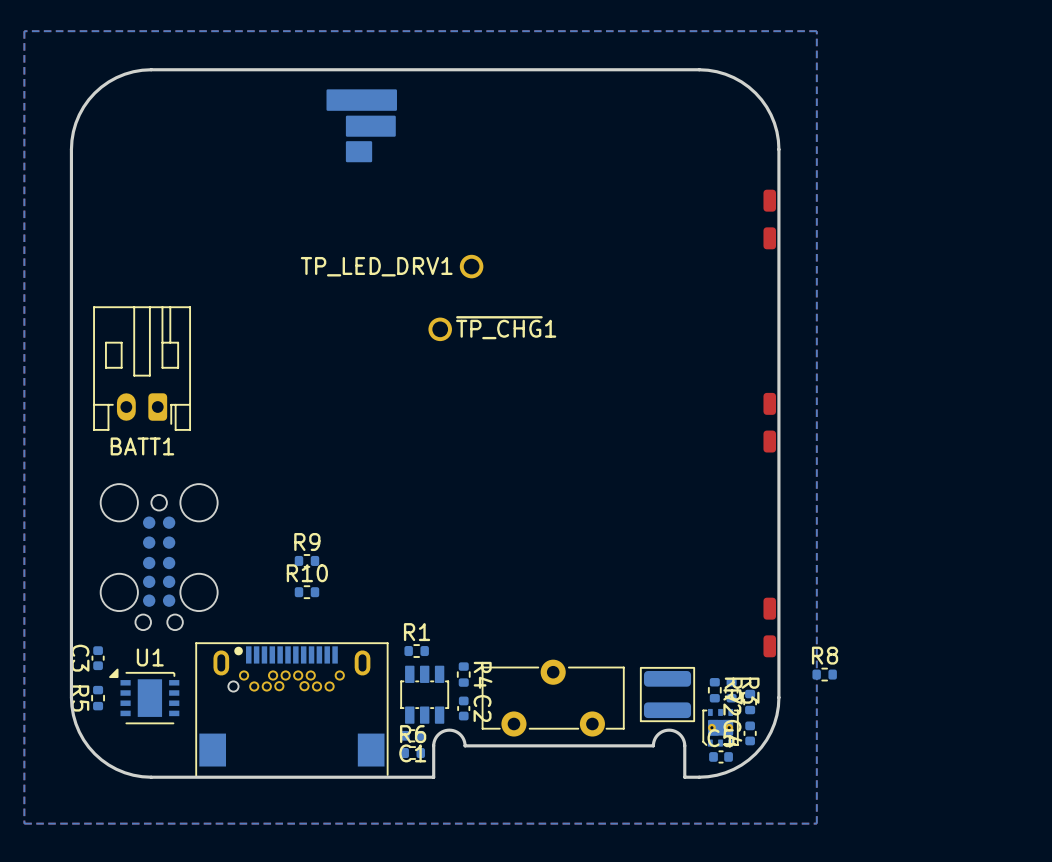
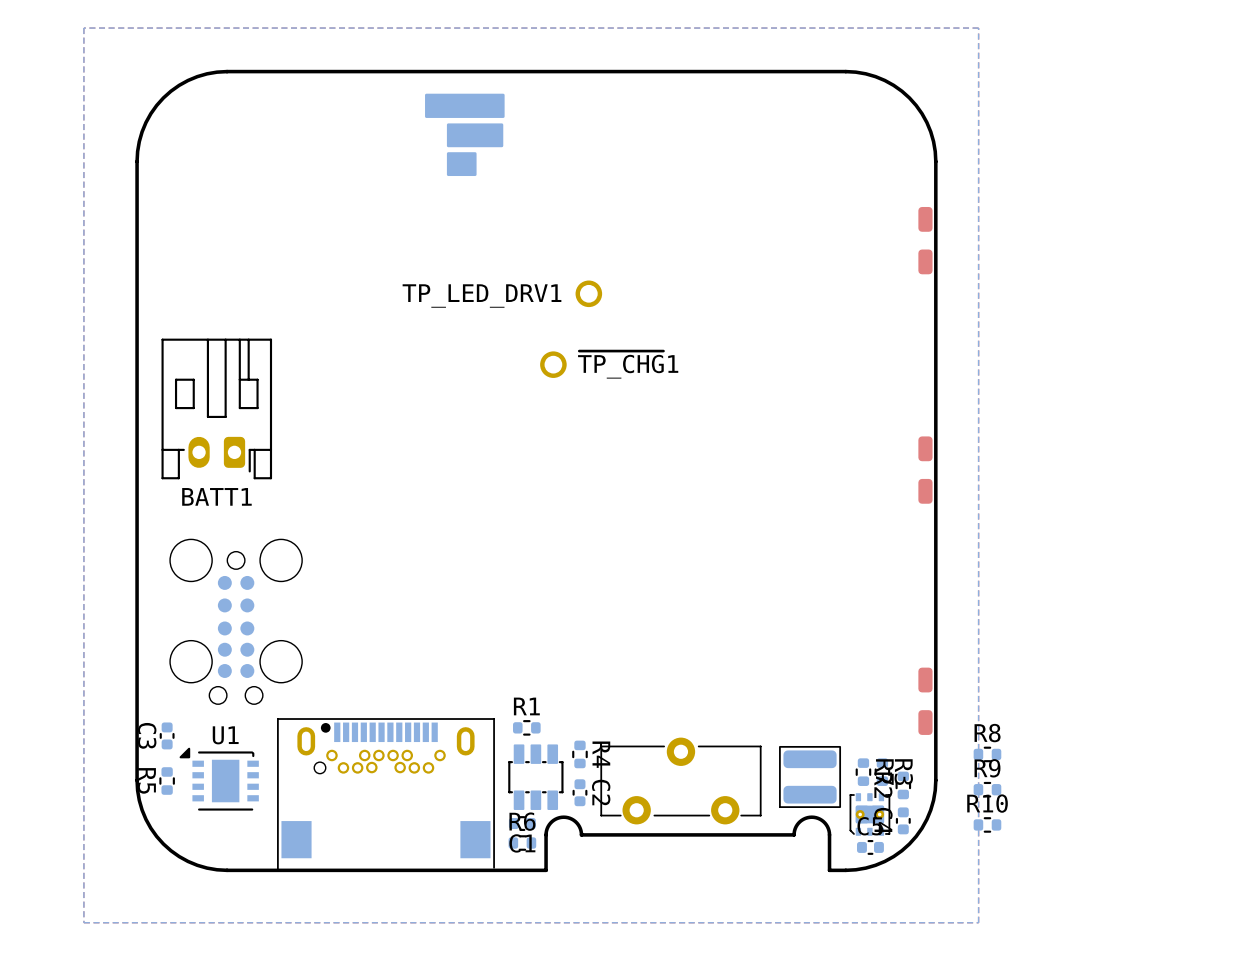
R9 position: (306, 560) -> (987, 789)
R10 position: (306, 592) -> (987, 824)

